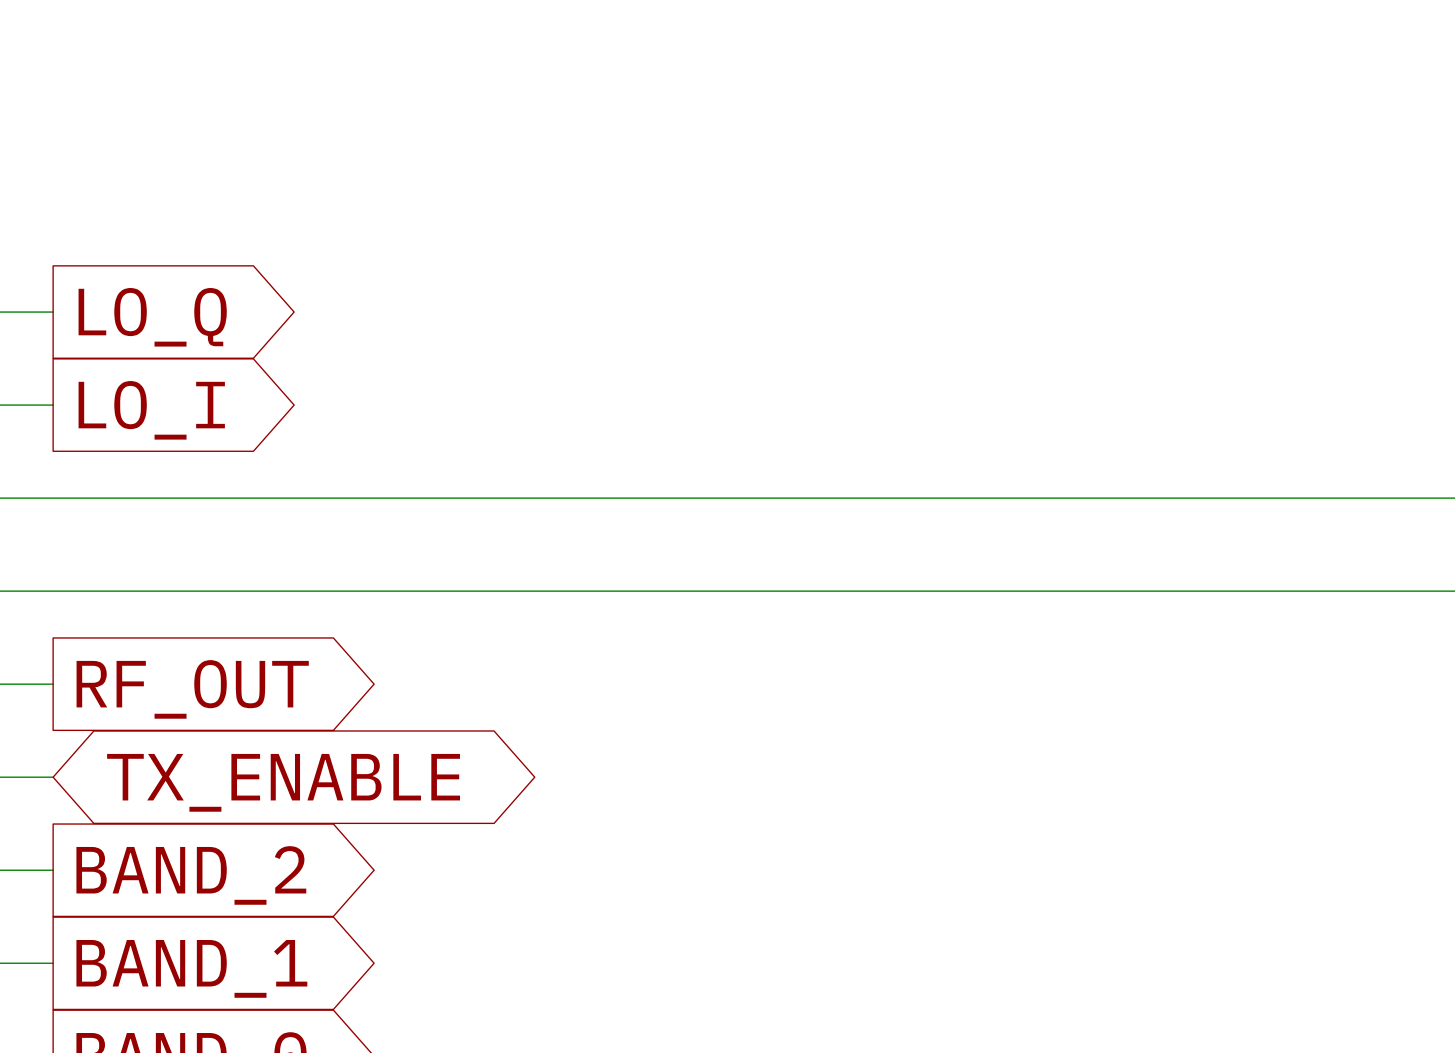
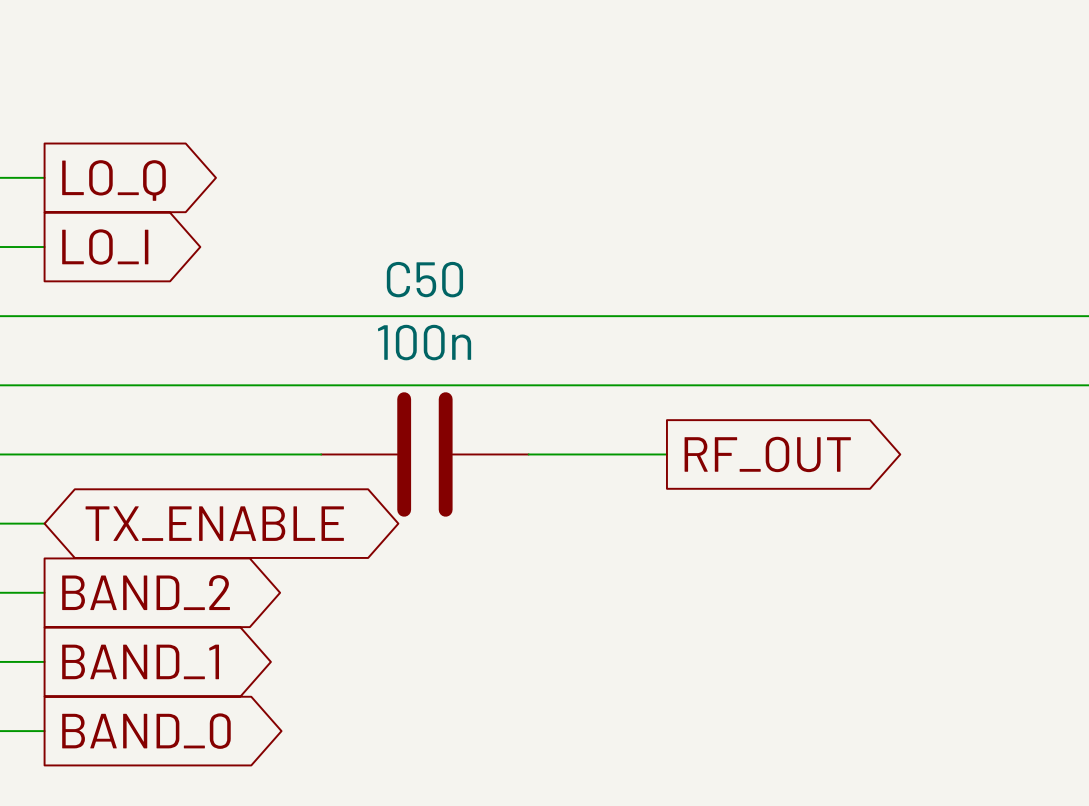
wire: none -> (44, 454) (321, 454)
C50: none -> 100n (424, 454)
wire: none -> (528, 454) (666, 454)
global label position: RF_OUT (192, 689) -> RF_OUT (767, 454)

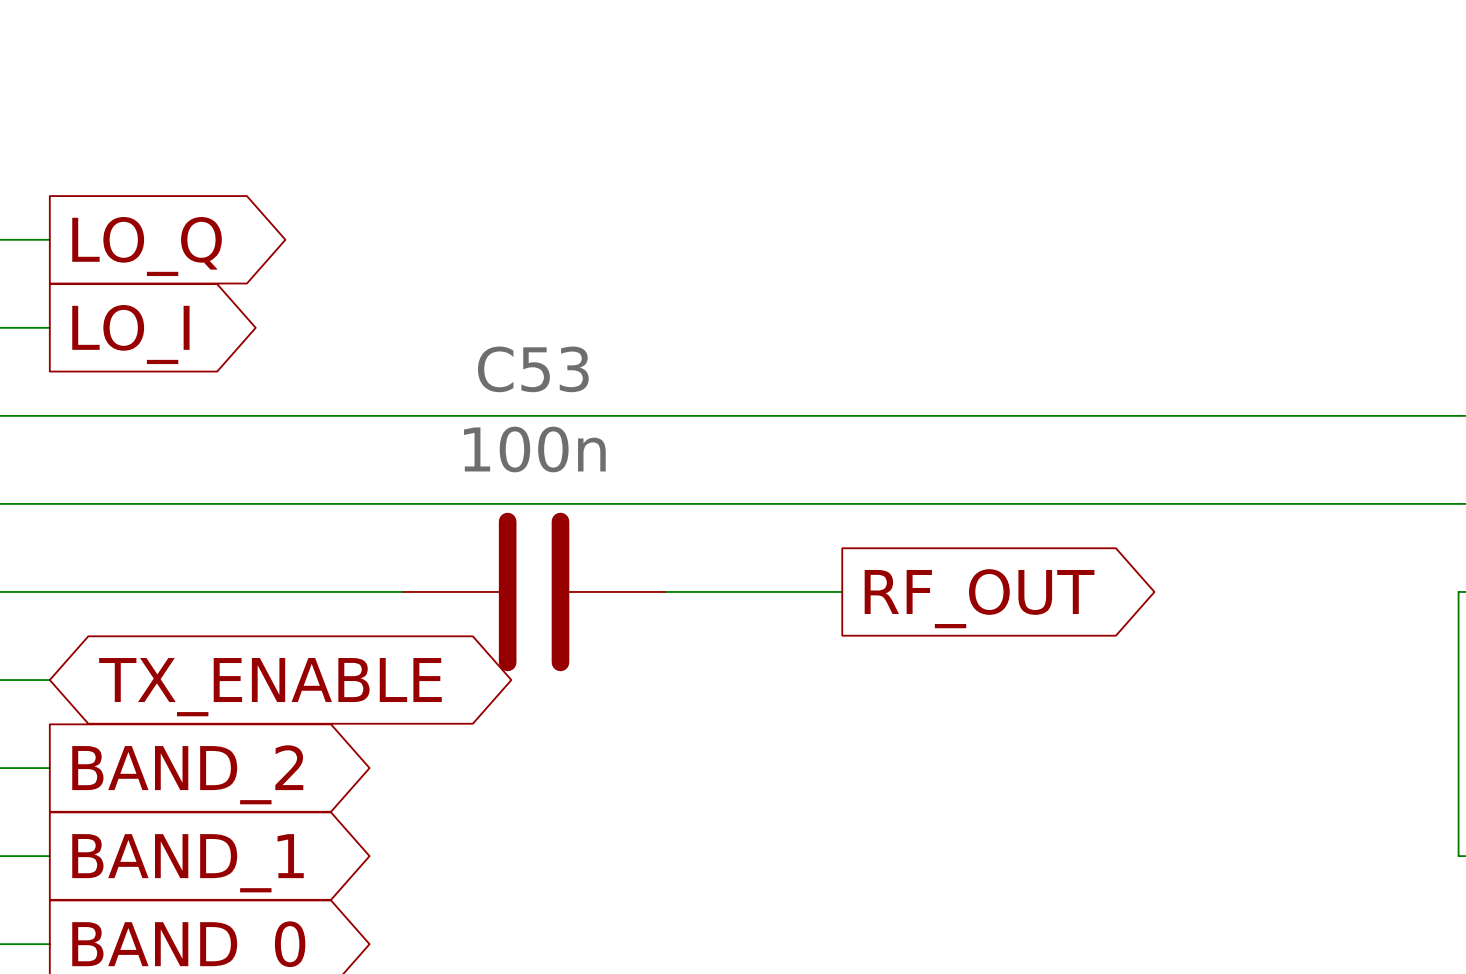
C50 name: C50 (424, 279) -> C53 (533, 369)

